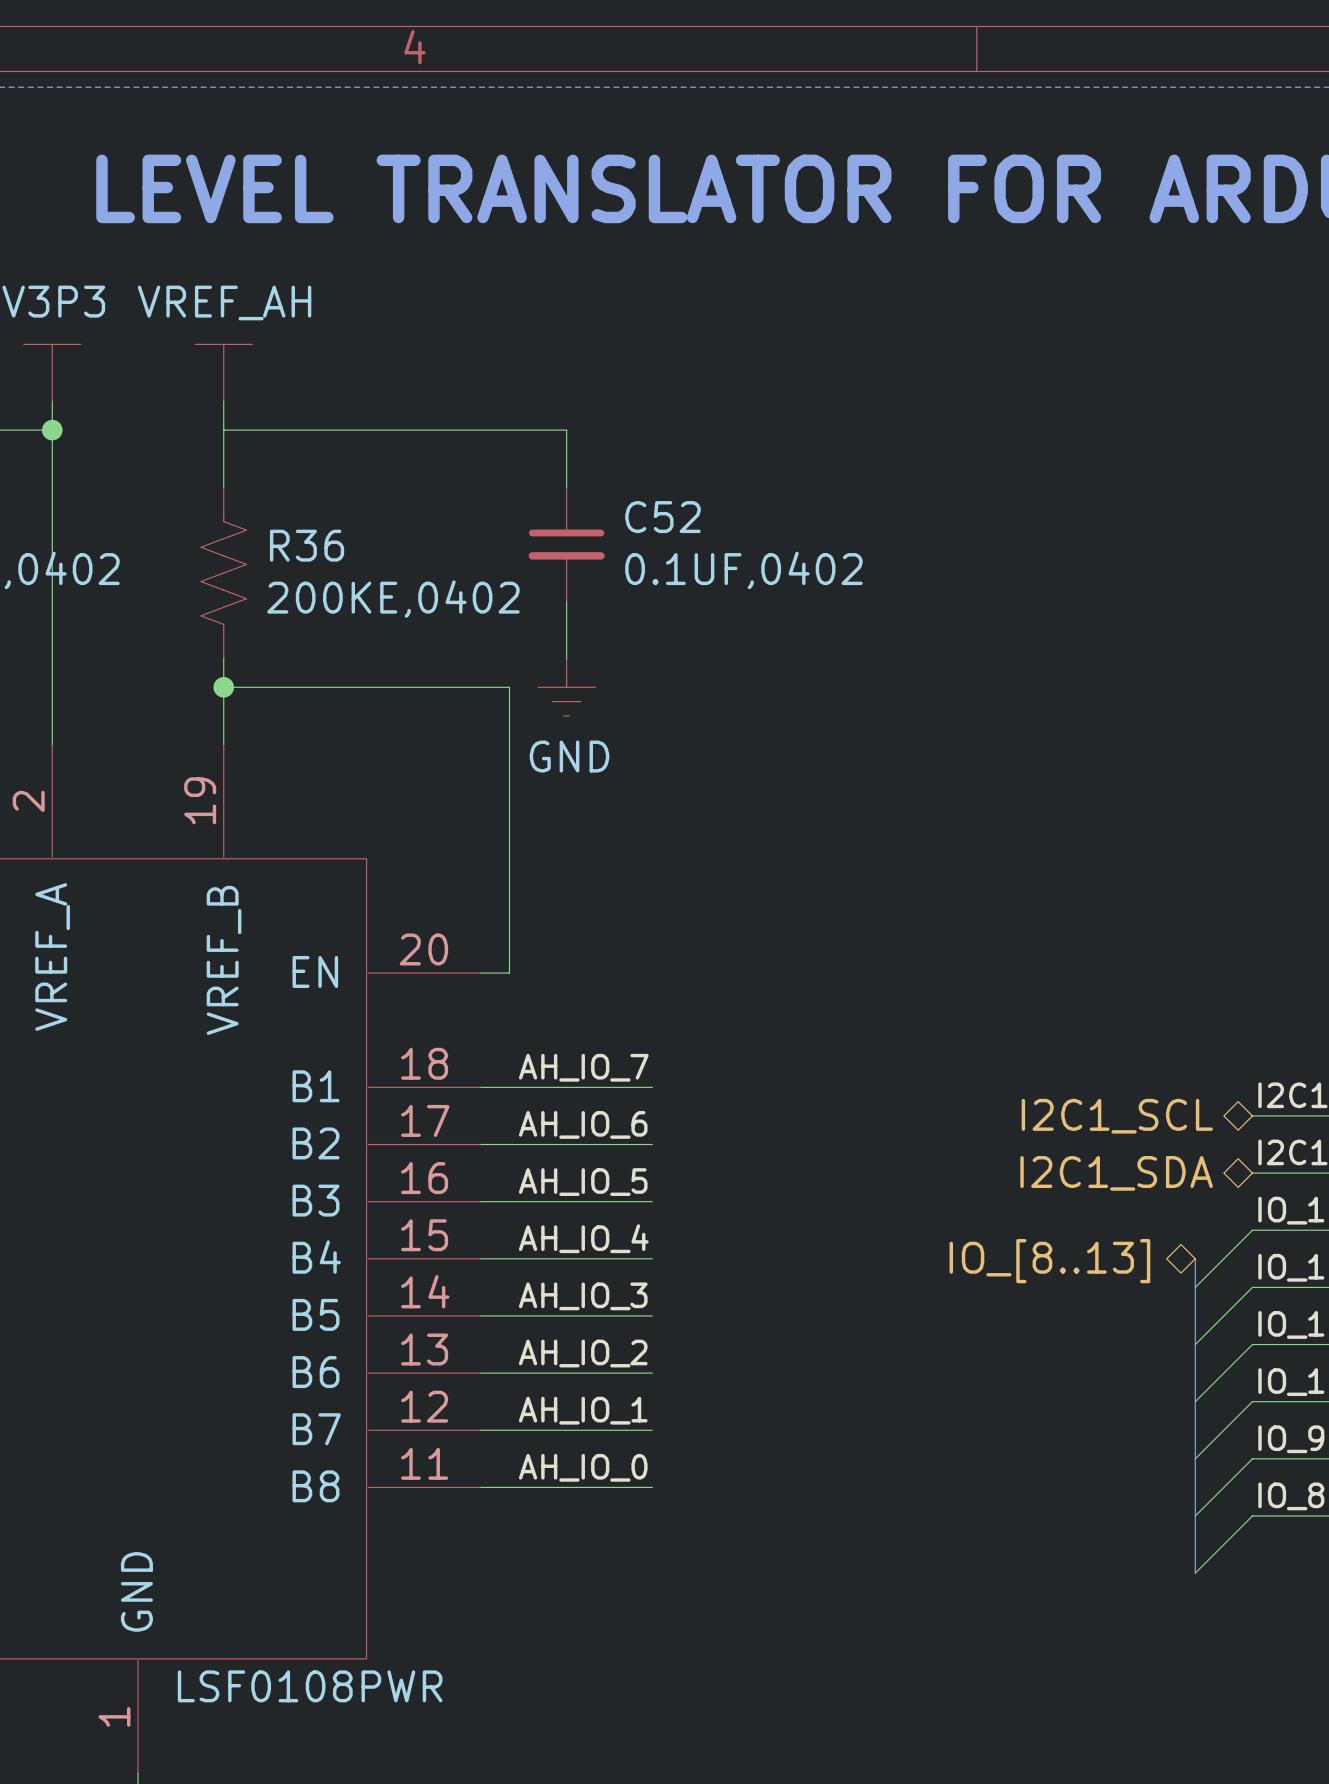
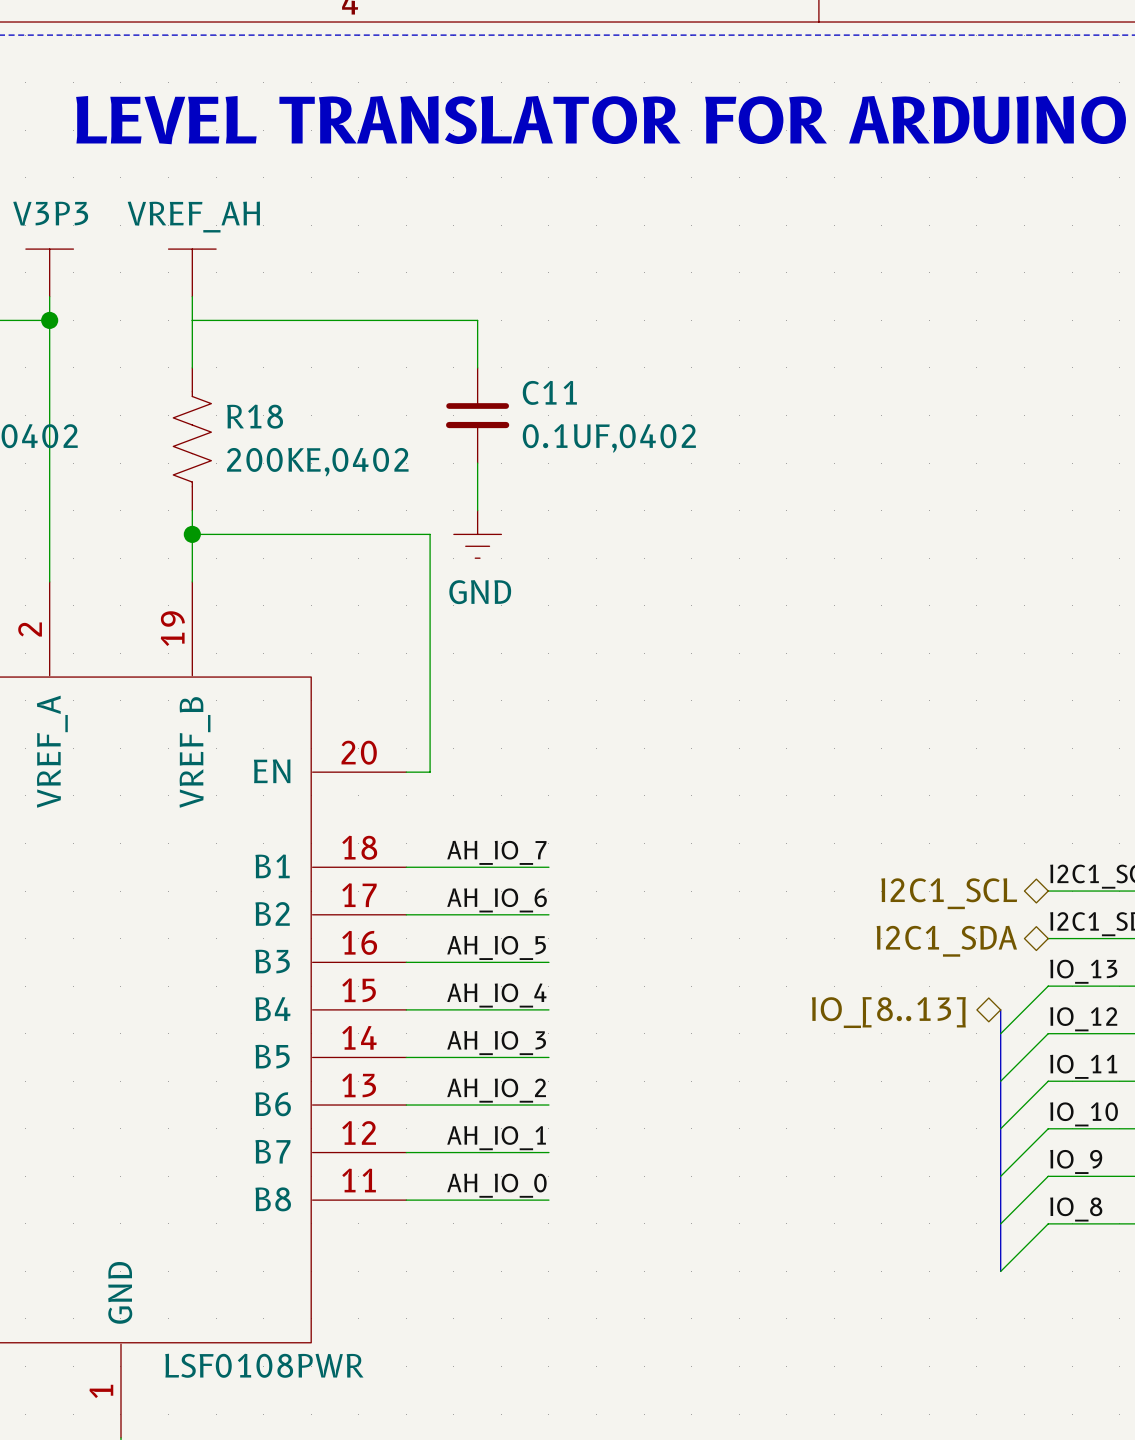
C52 name: C52 (662, 517) -> C11 (549, 392)
R36 name: R36 (307, 545) -> R18 (255, 416)

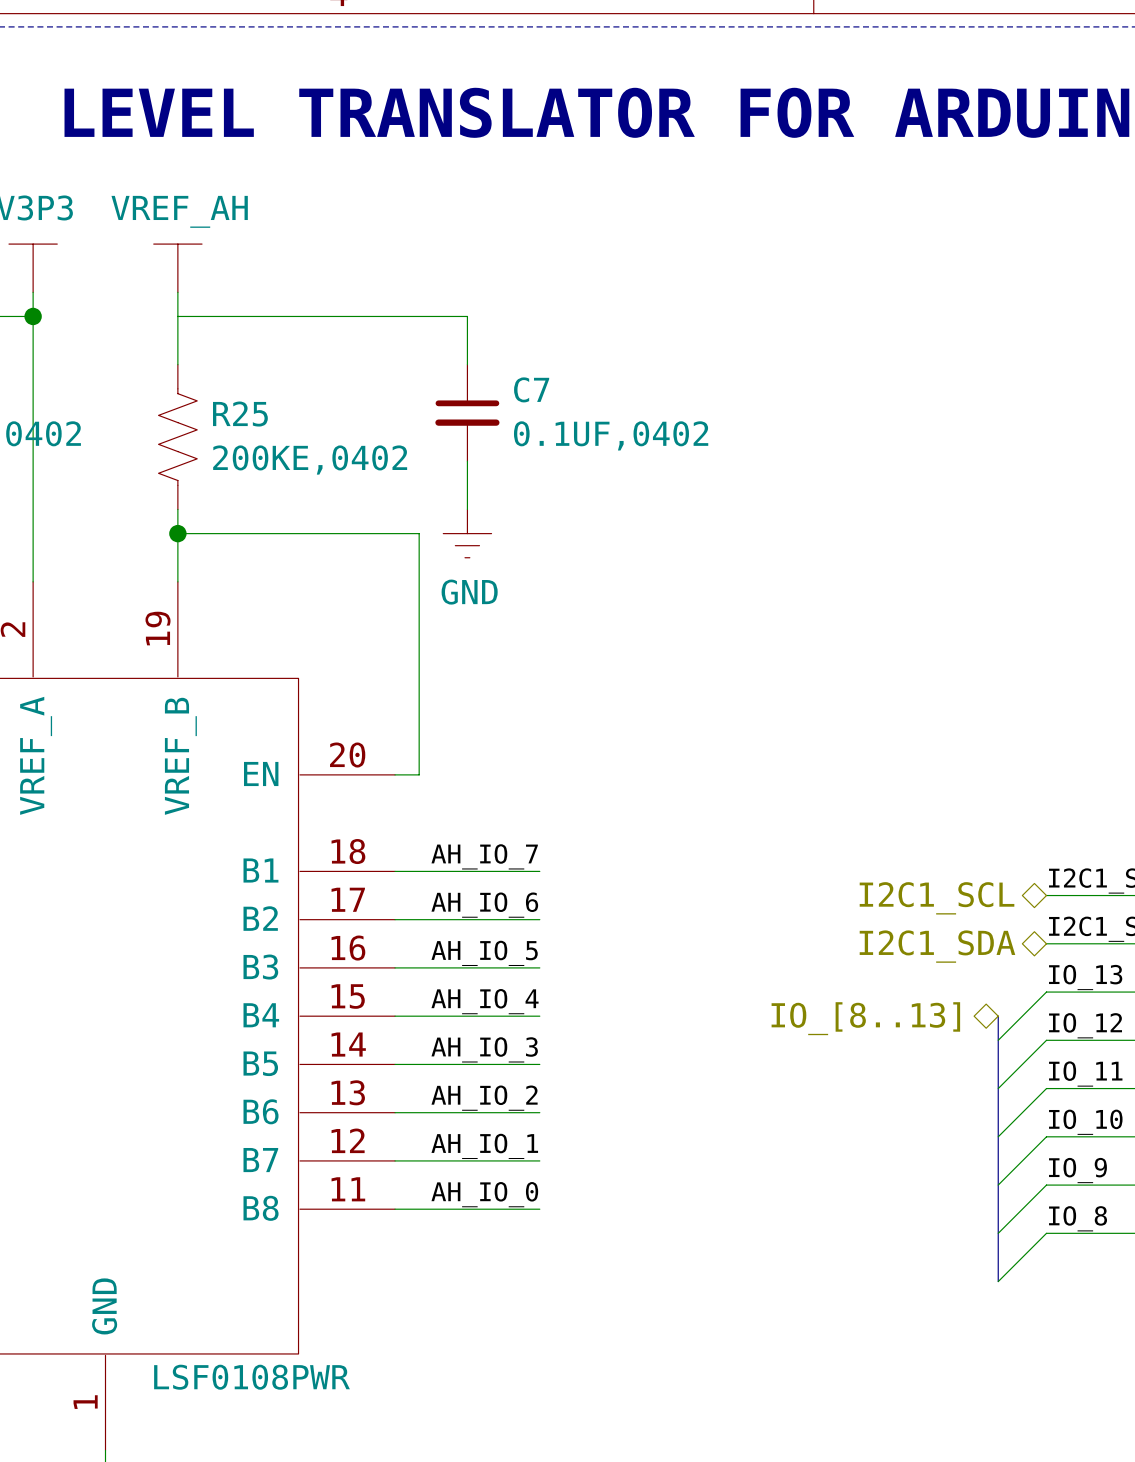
C11 name: C11 (549, 392) -> C7 (531, 389)
R18 name: R18 (255, 416) -> R25 (240, 414)

